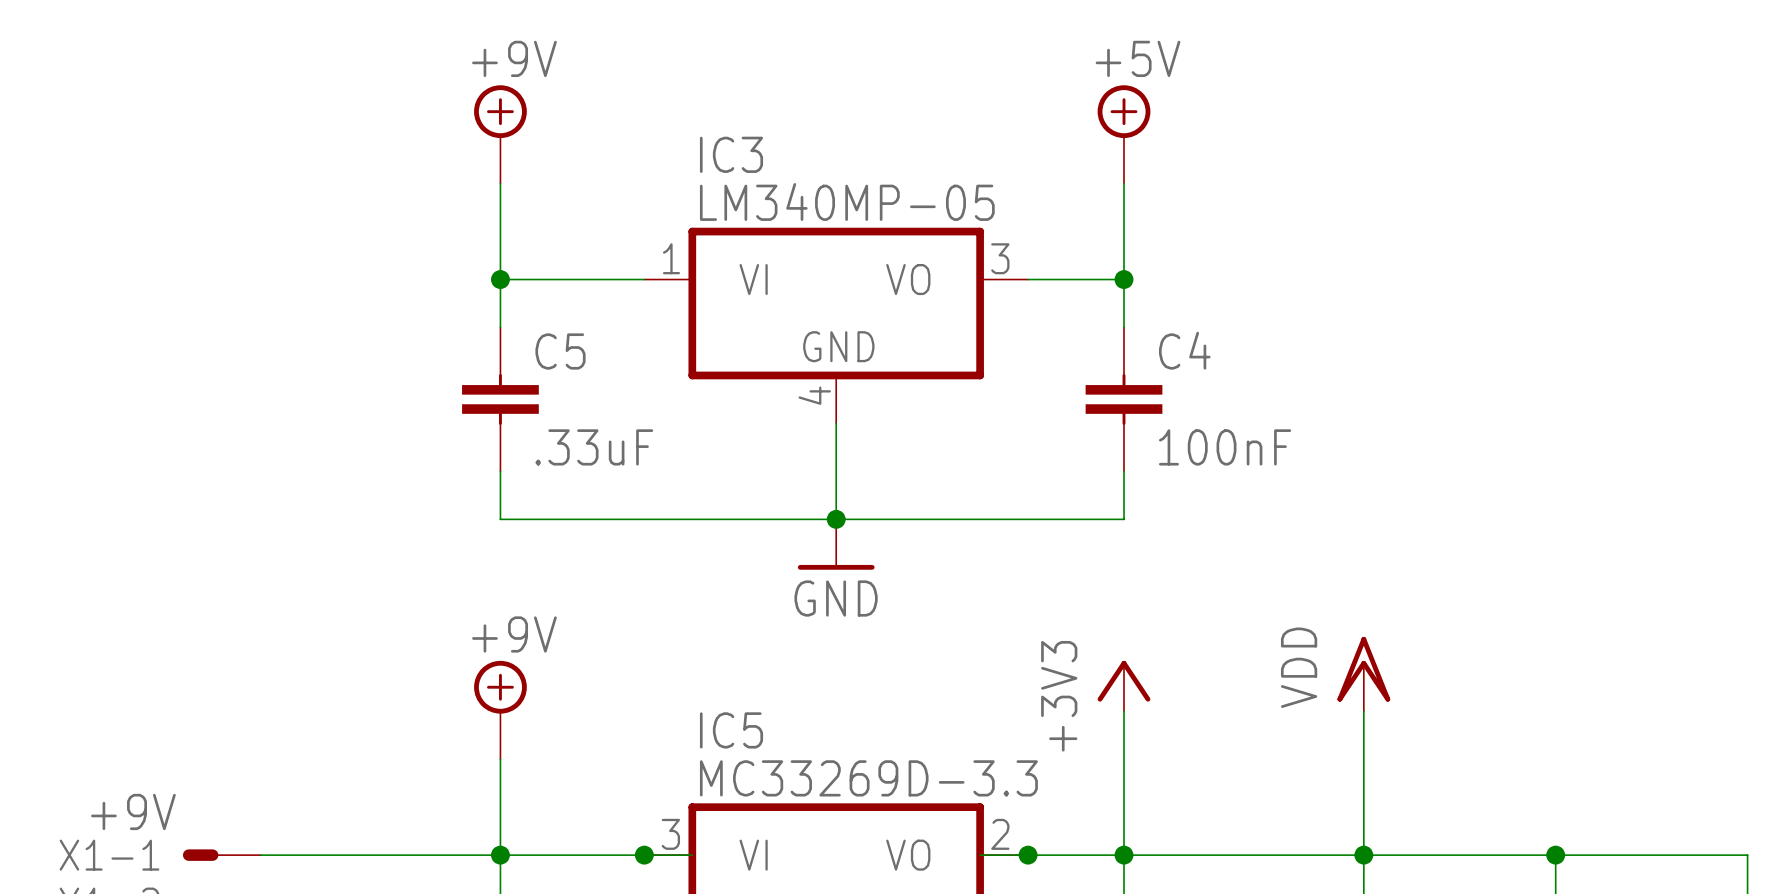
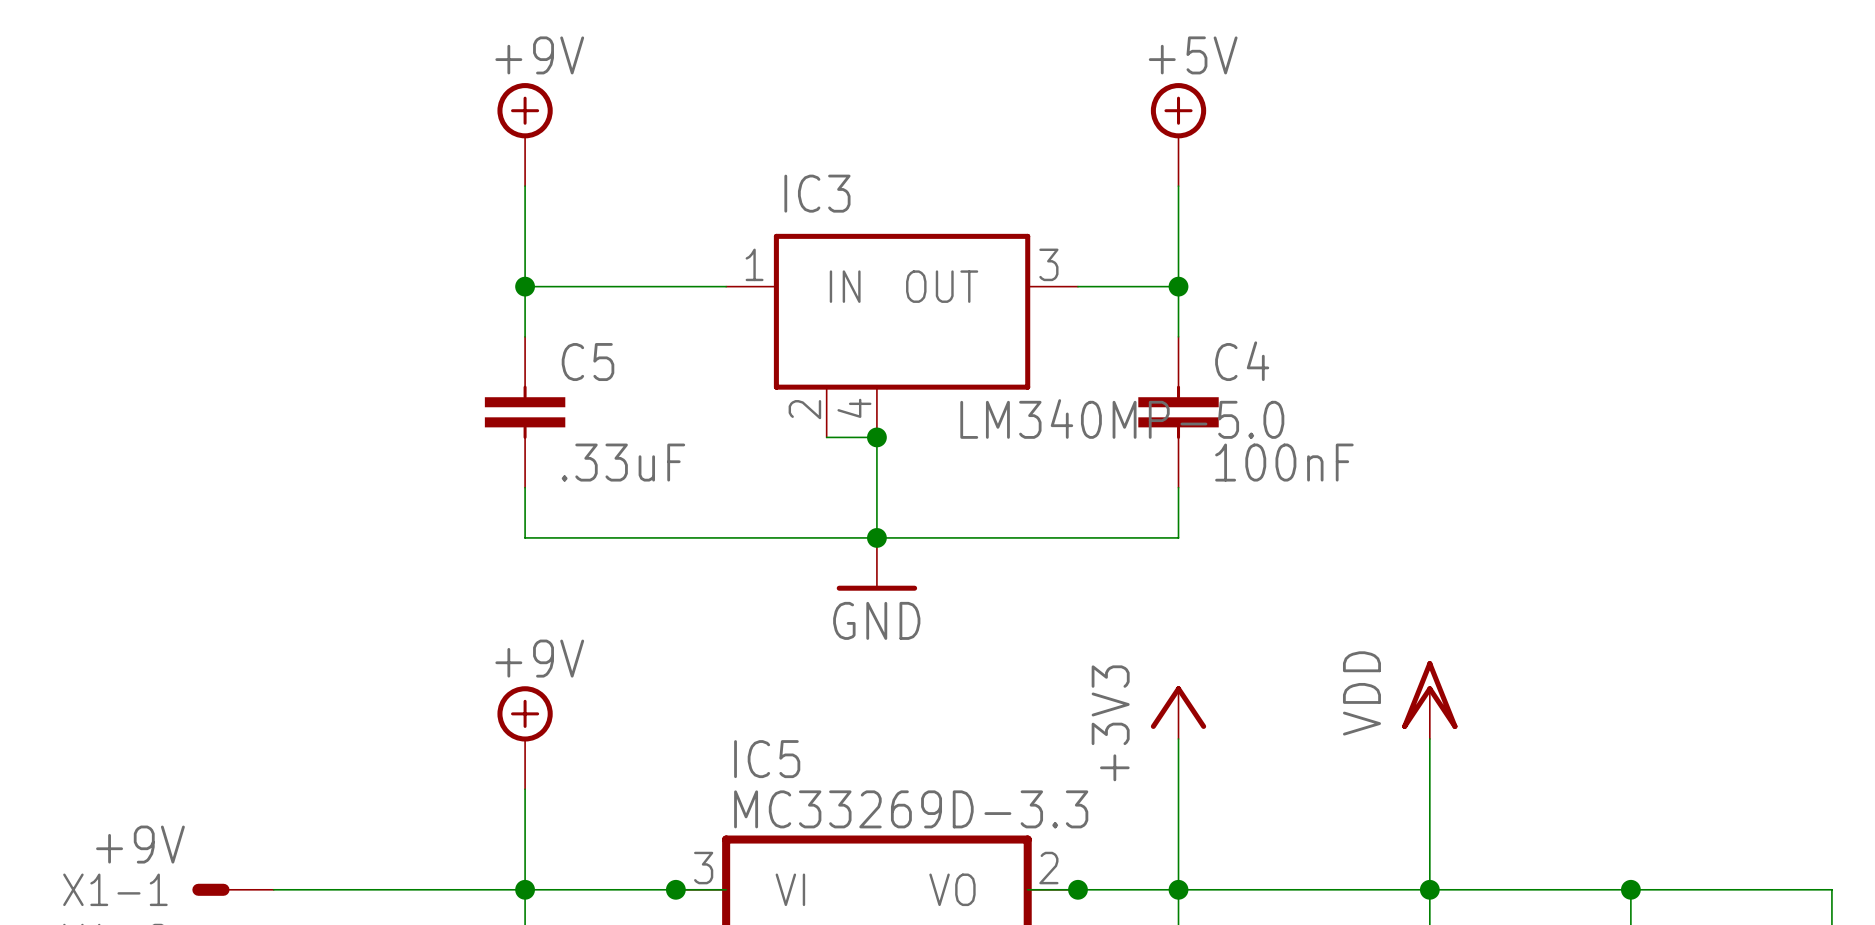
IC3 name position: IC3 (731, 154) -> IC3 (817, 193)
IC3 value: LM340MP-05 (847, 201) -> LM340MP-5.0 (1122, 418)
IC3 symbol: [644, 227, 1029, 424] -> [726, 233, 1078, 438]
wire: none -> (826, 437) (876, 437)
junction: none -> (876, 437)

